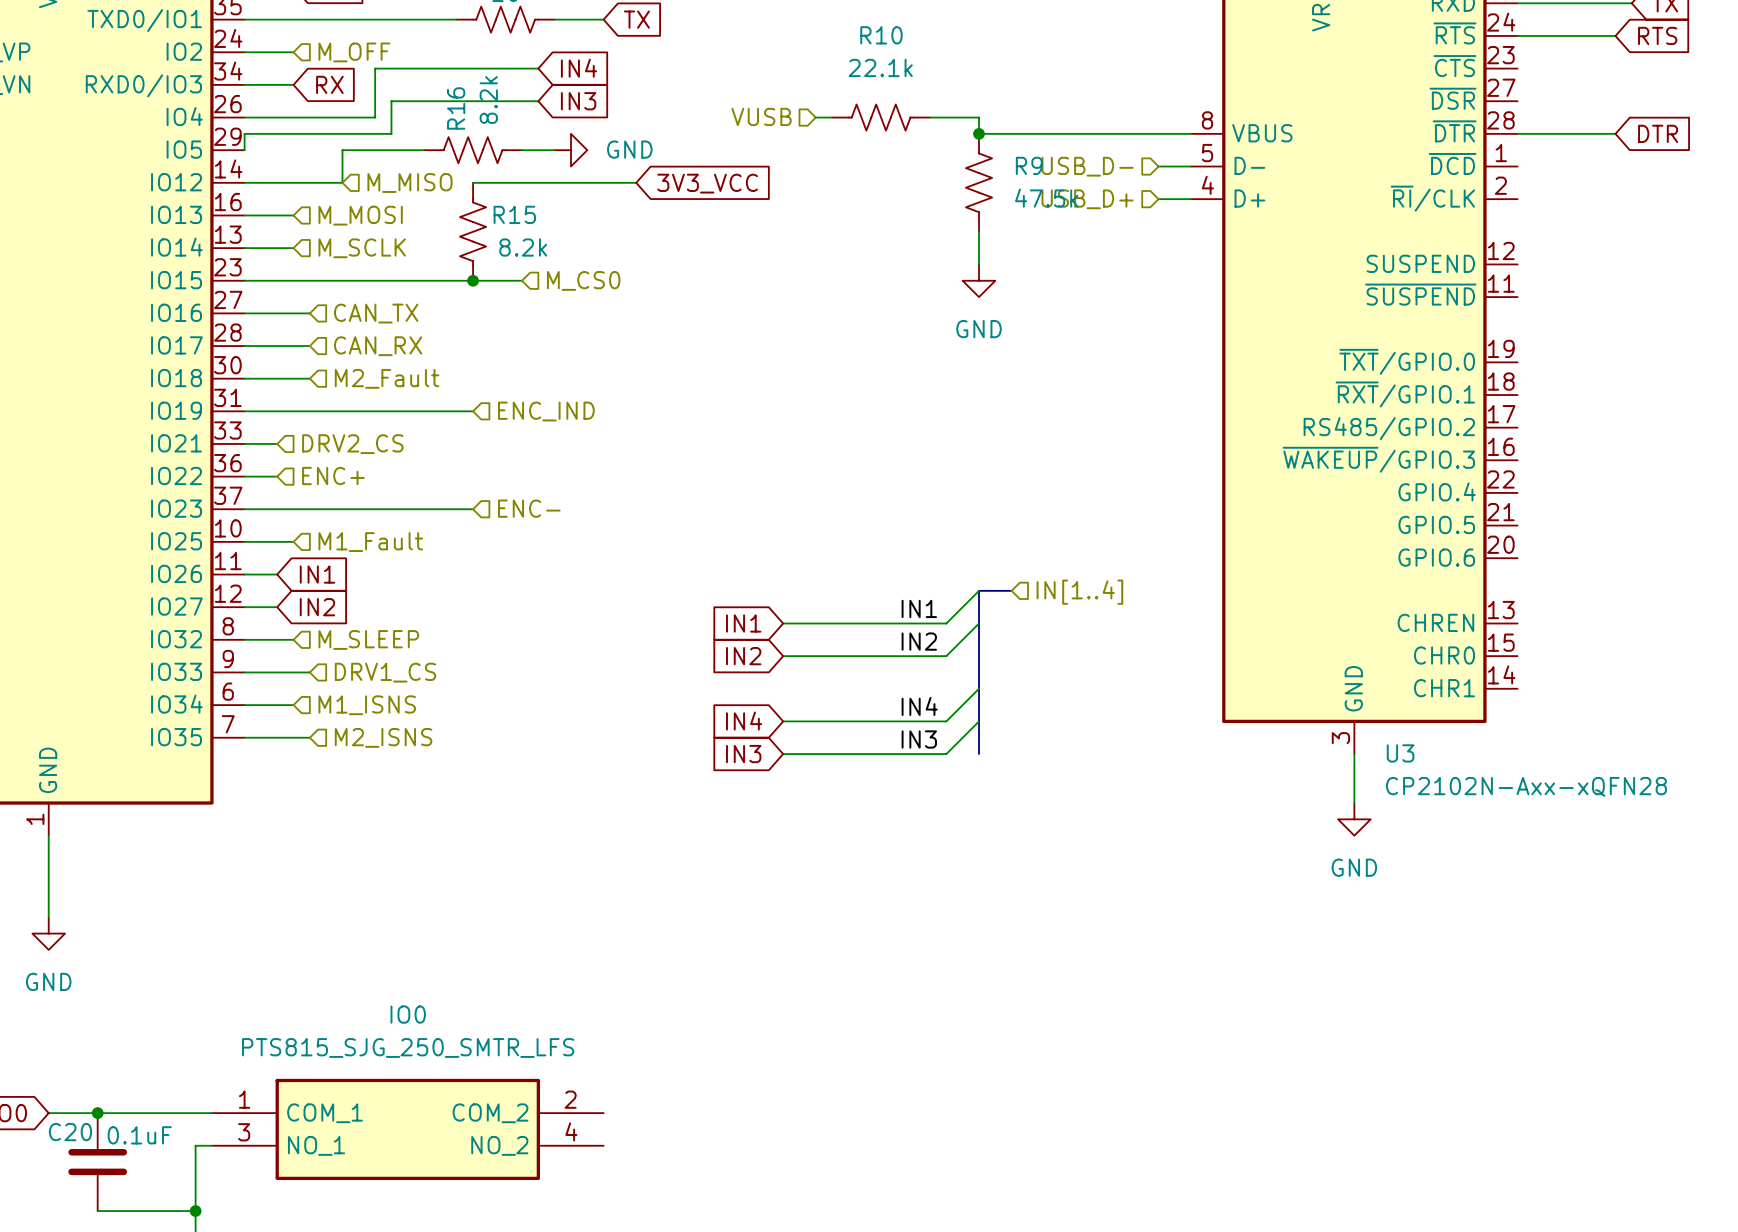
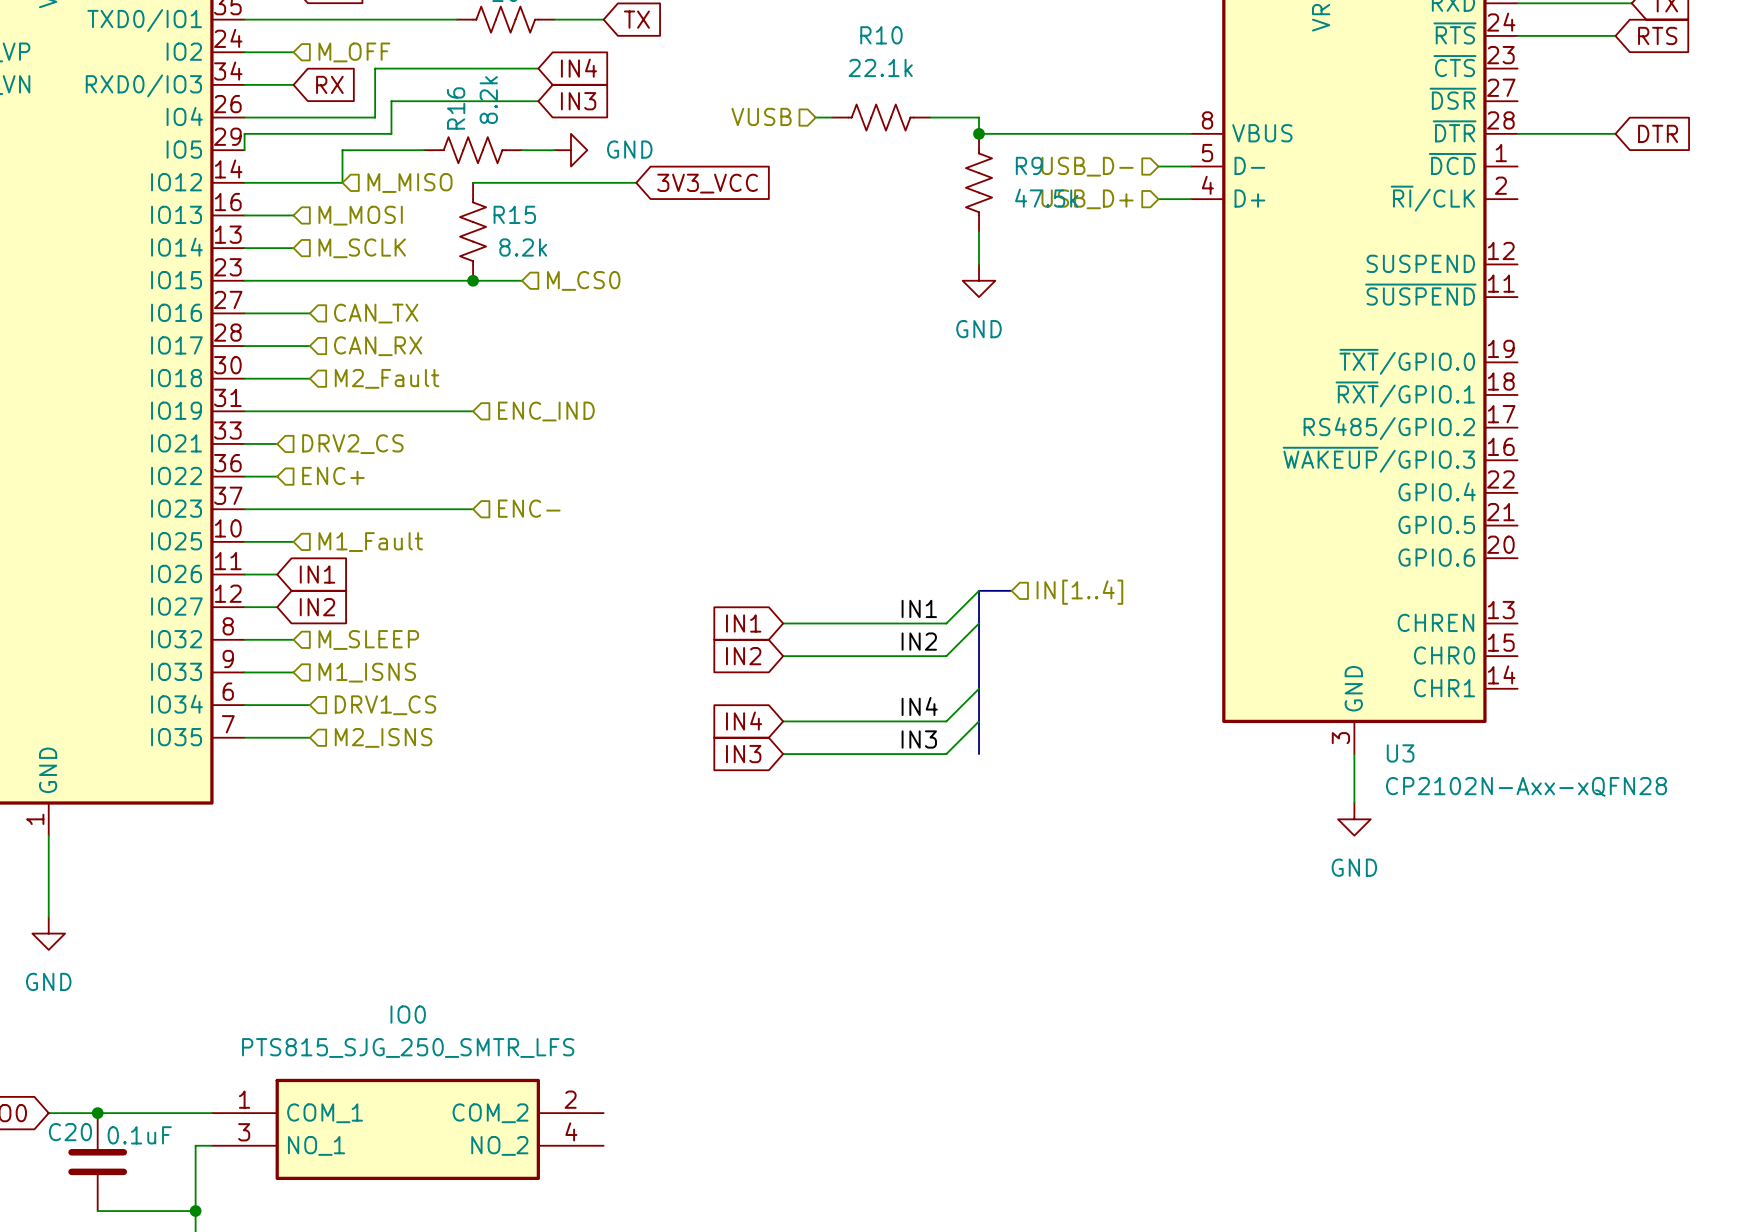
wire: (293, 672) (309, 672) -> (293, 705) (309, 705)
hierarchical label position: DRV1_CS (385, 672) -> DRV1_CS (385, 705)
hierarchical label position: M1_ISNS (367, 705) -> M1_ISNS (367, 672)

